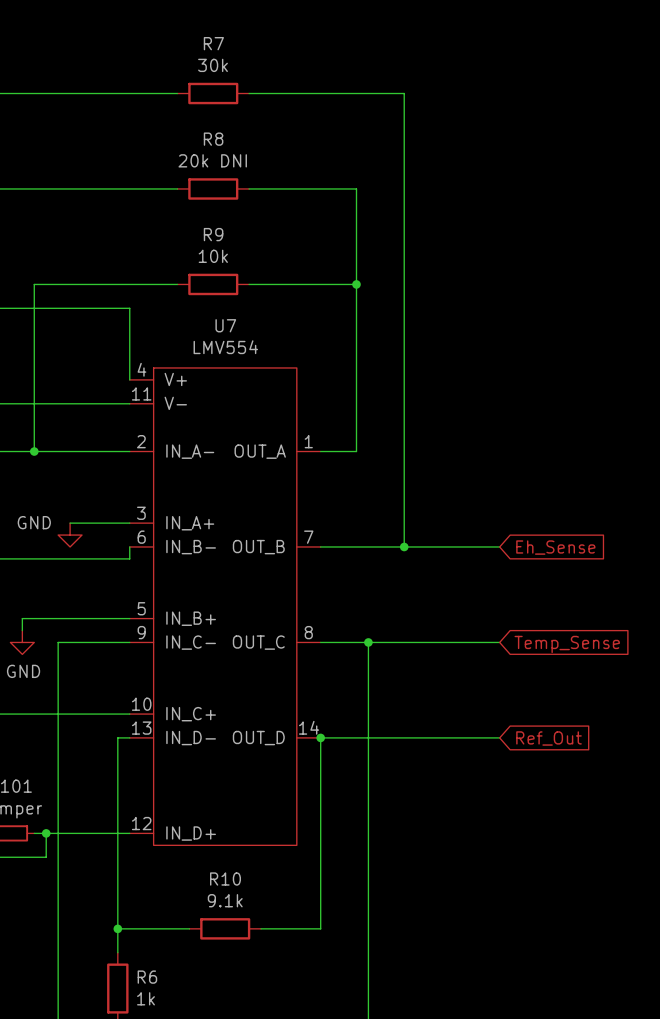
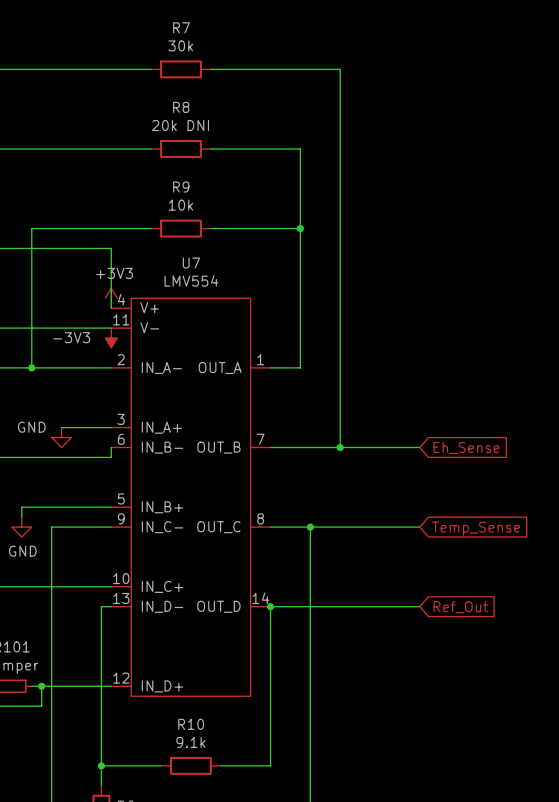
power symbol: none -> +3V3 (111, 298)
power symbol: none -> -3V3 (111, 338)

